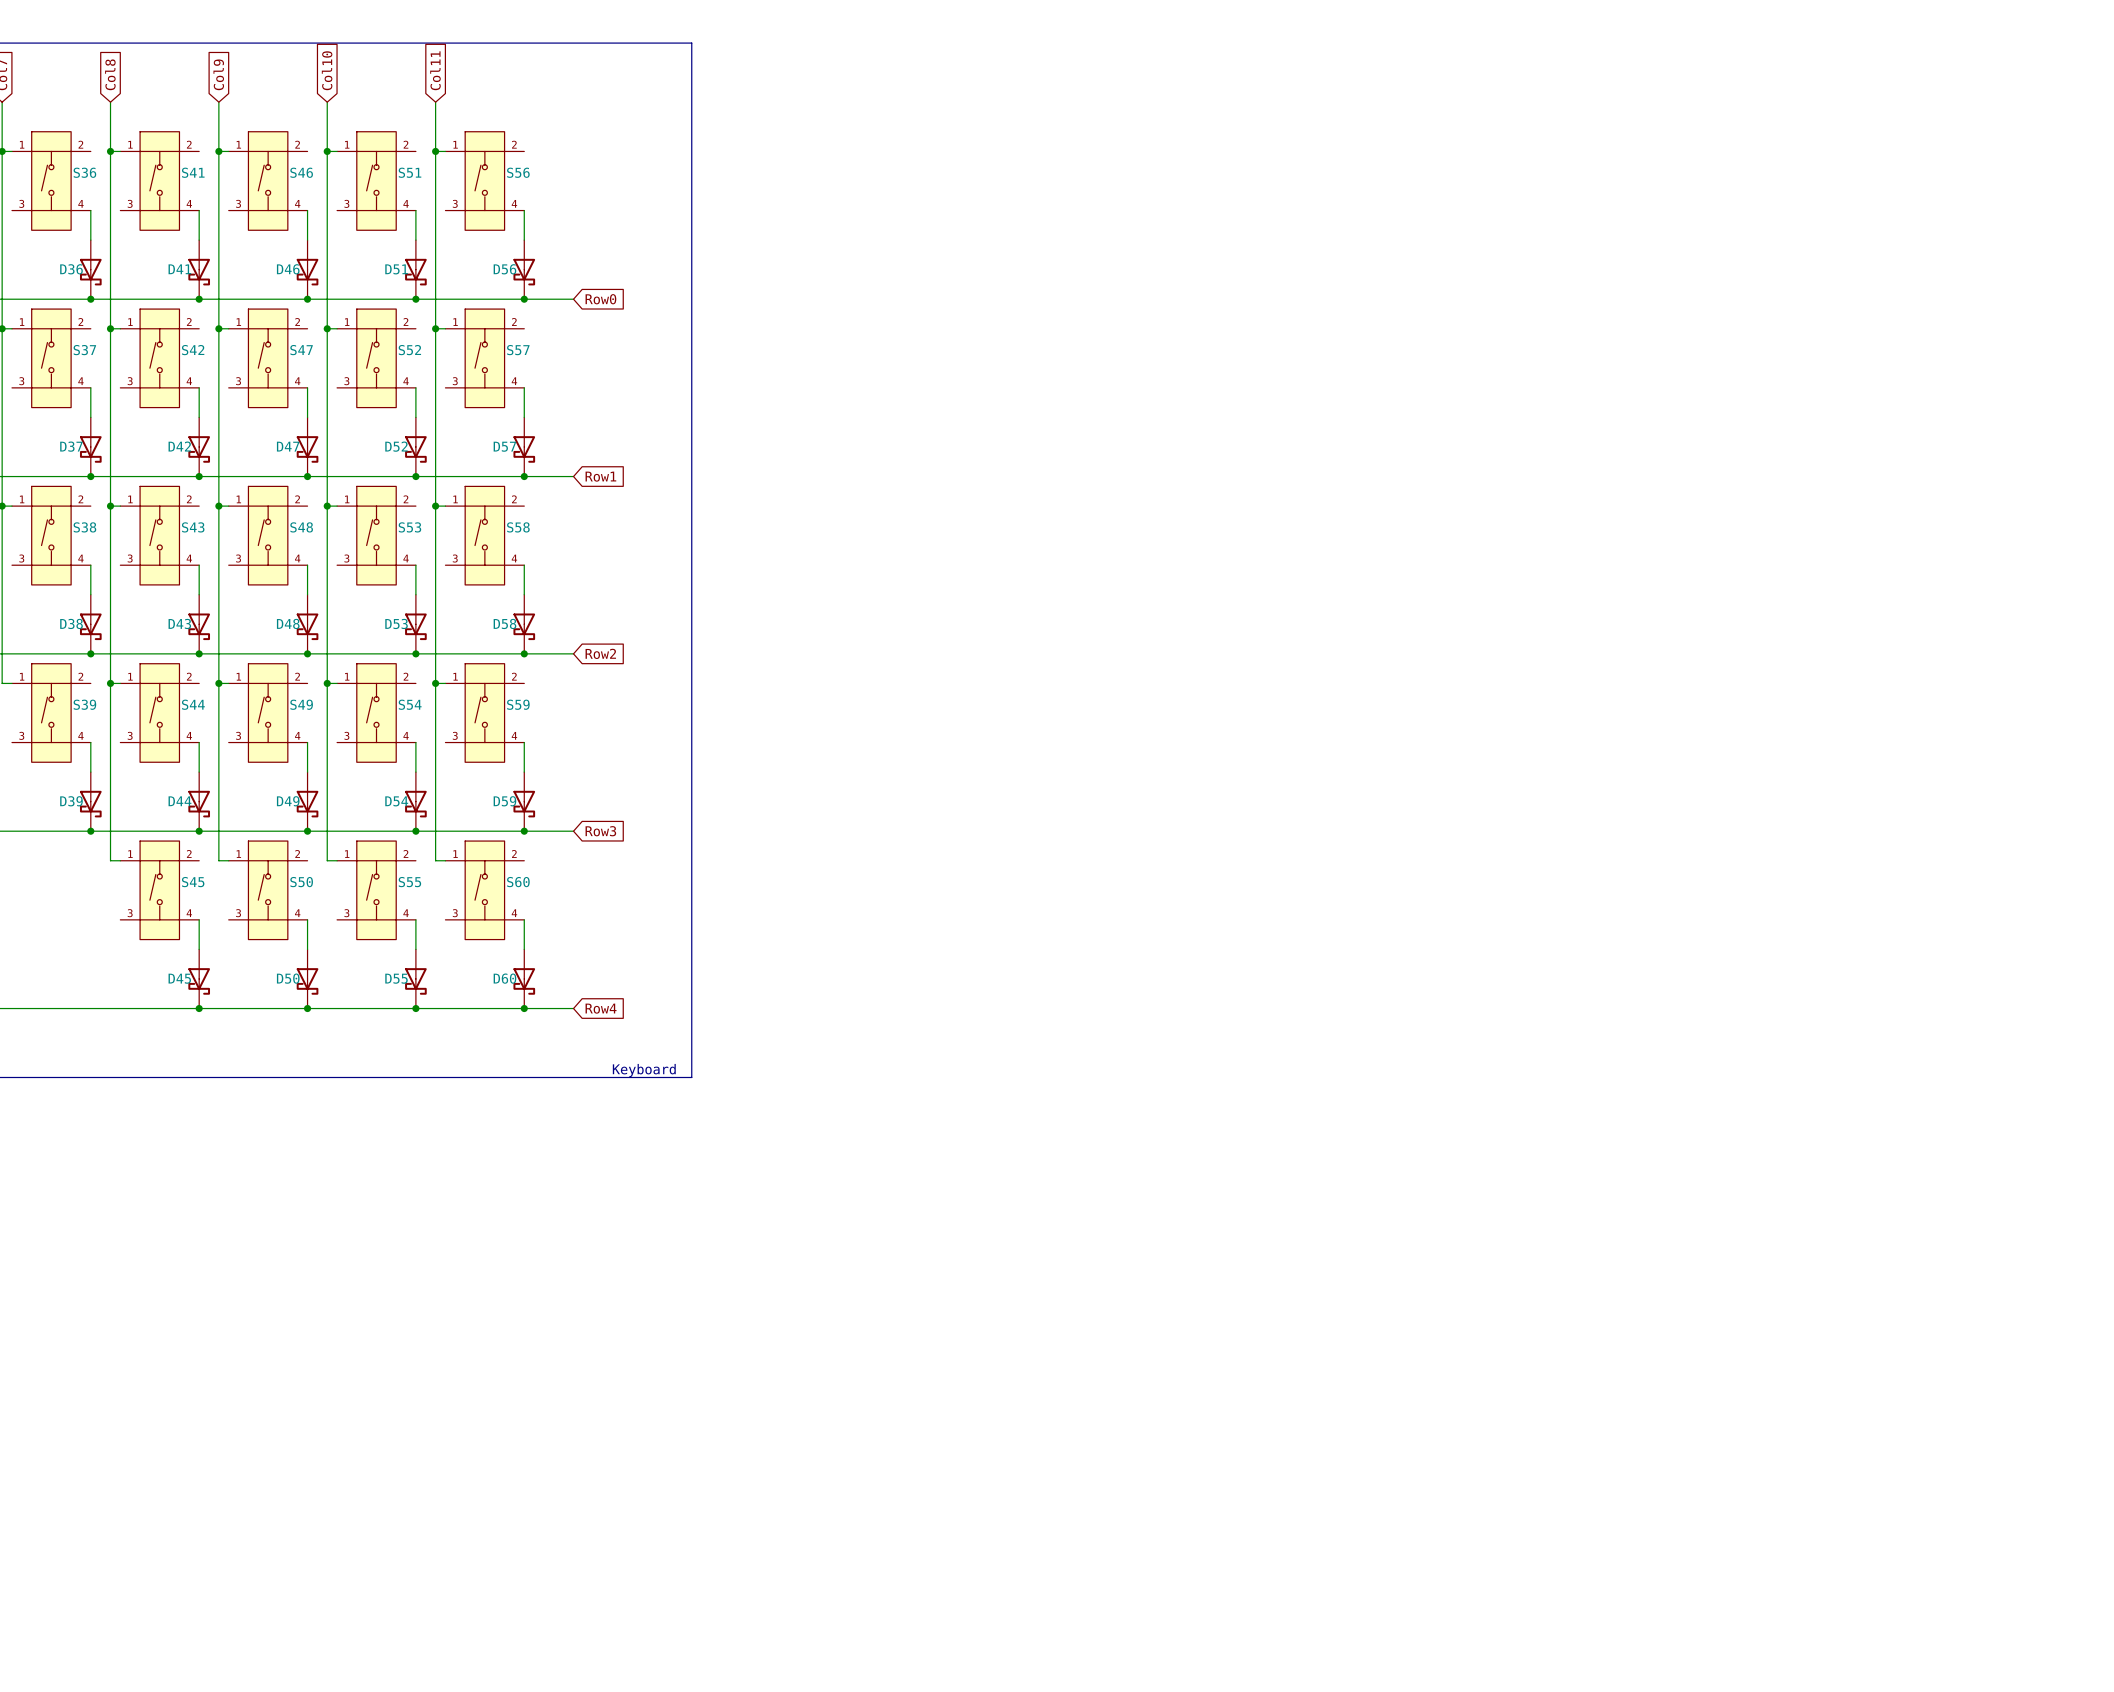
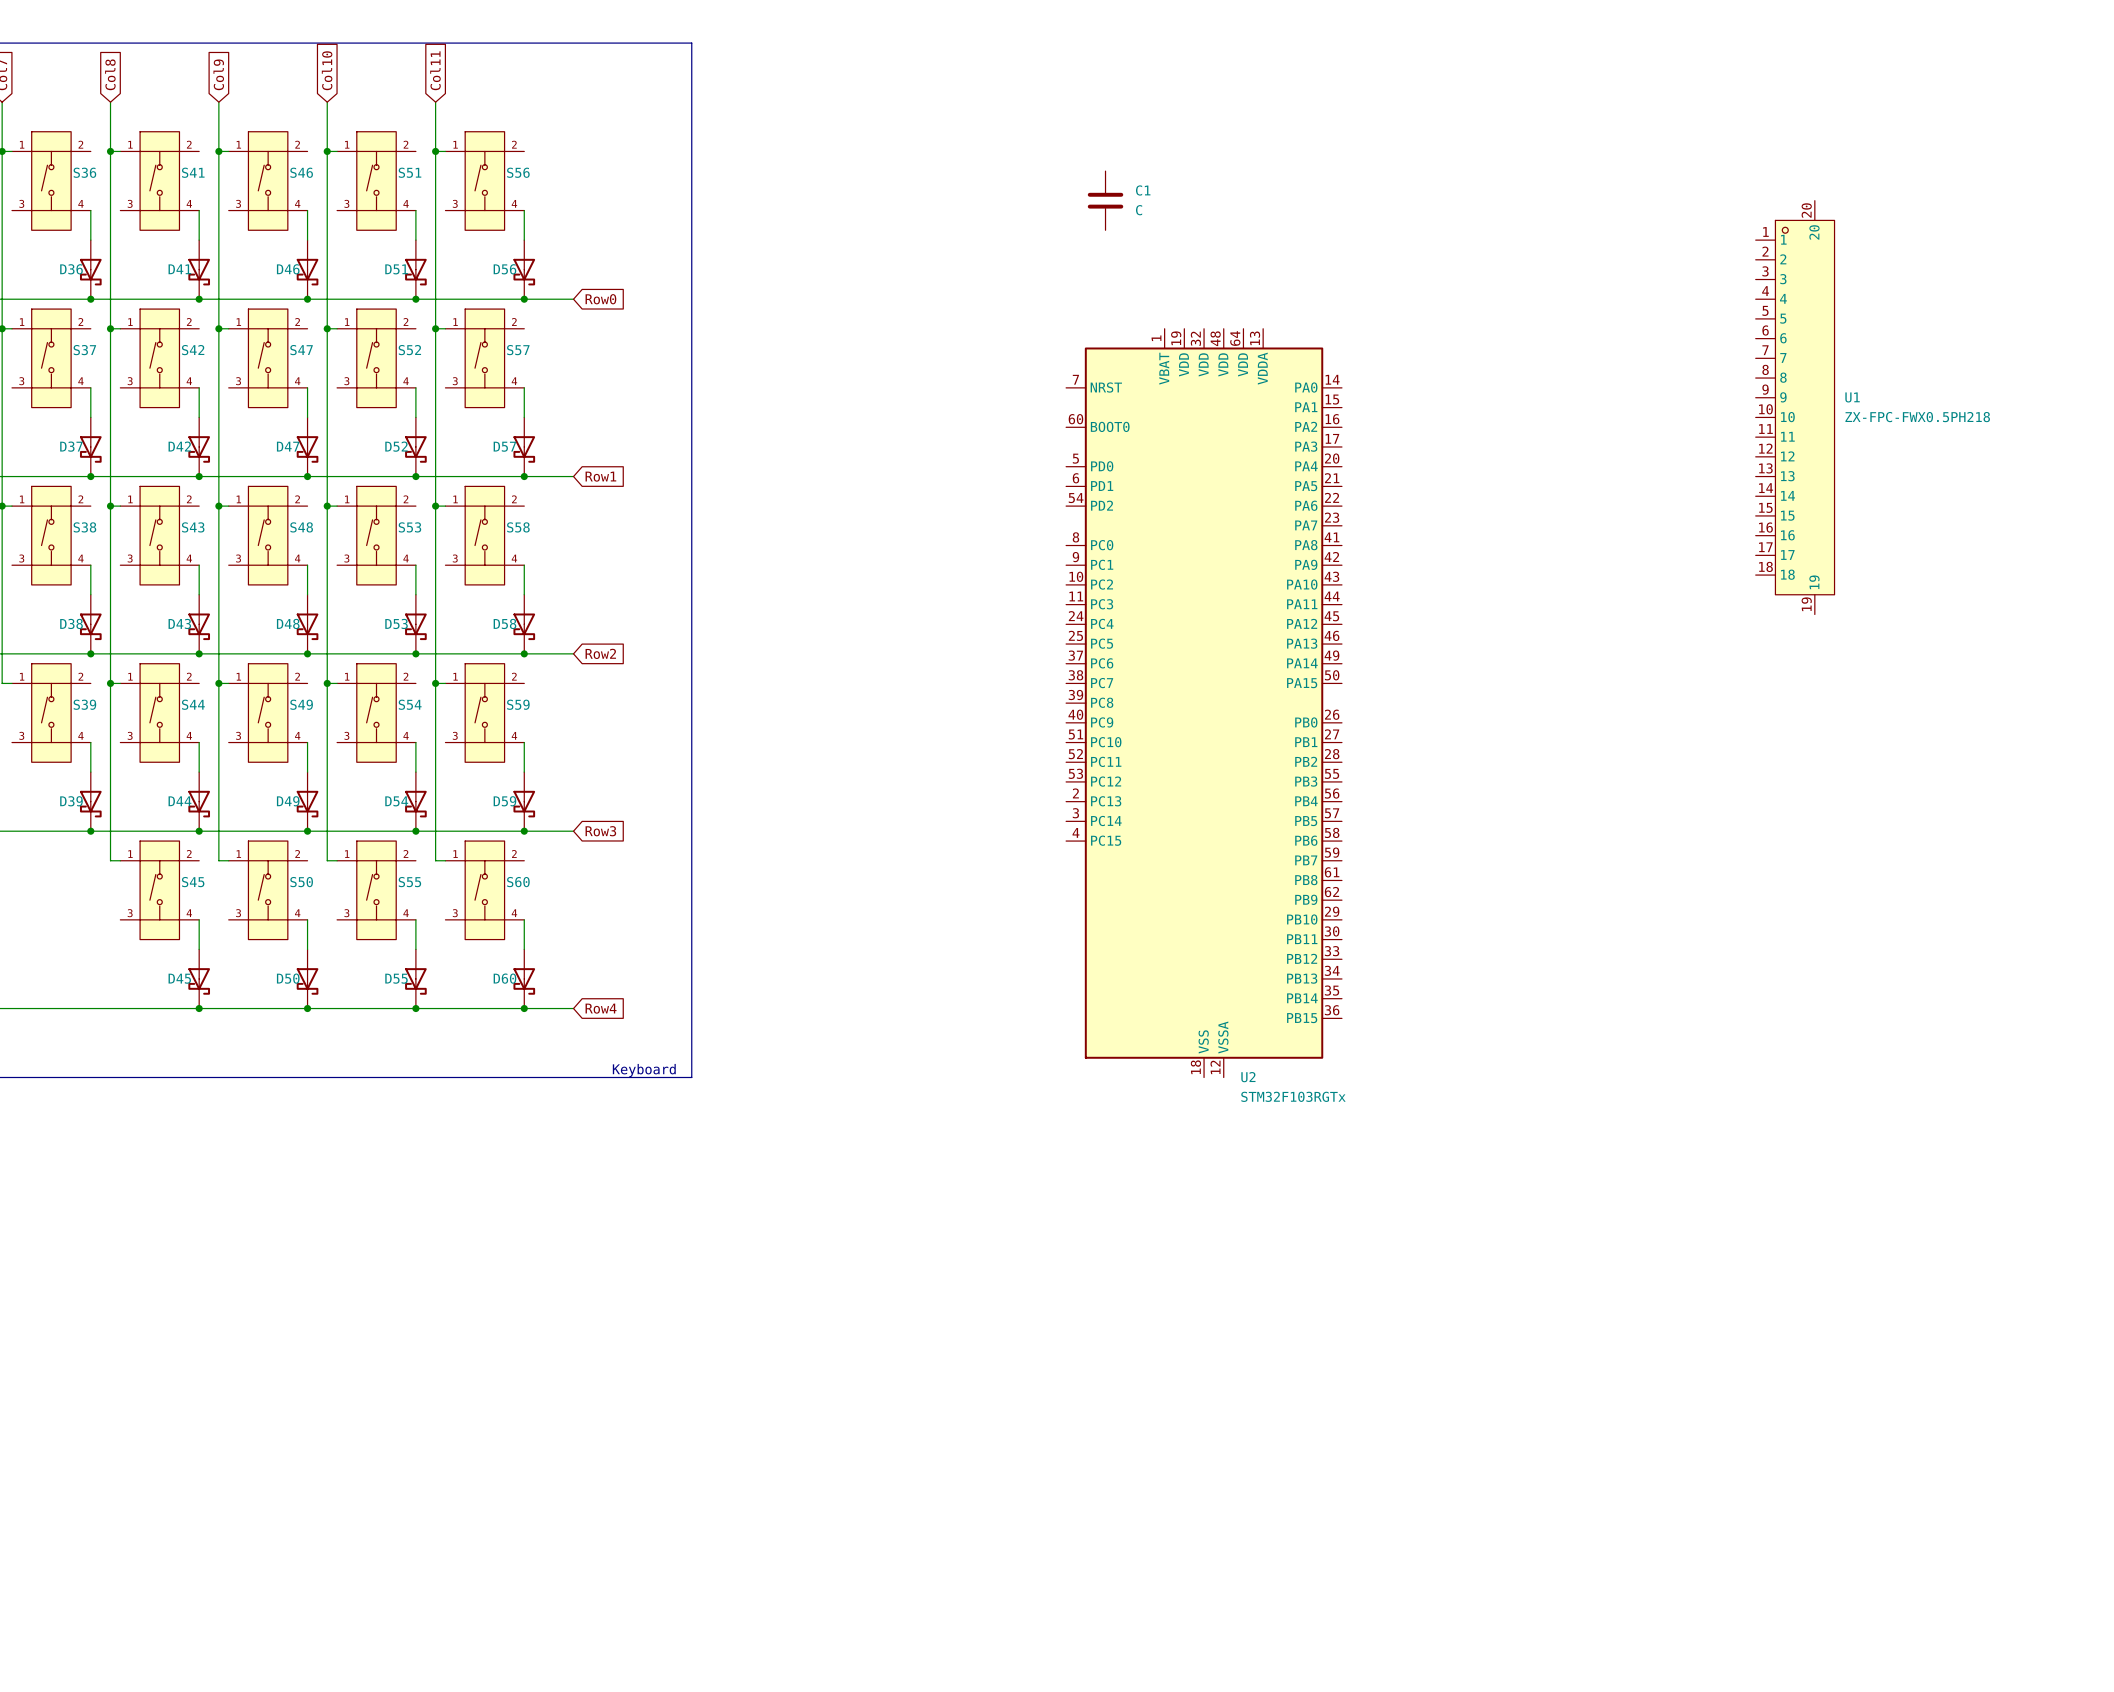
C1: none -> C (1105, 200)
U1: none -> ZX-FPC-FWX0.5PH218 (1795, 407)
U2: none -> STM32F103RGTx (1204, 703)

